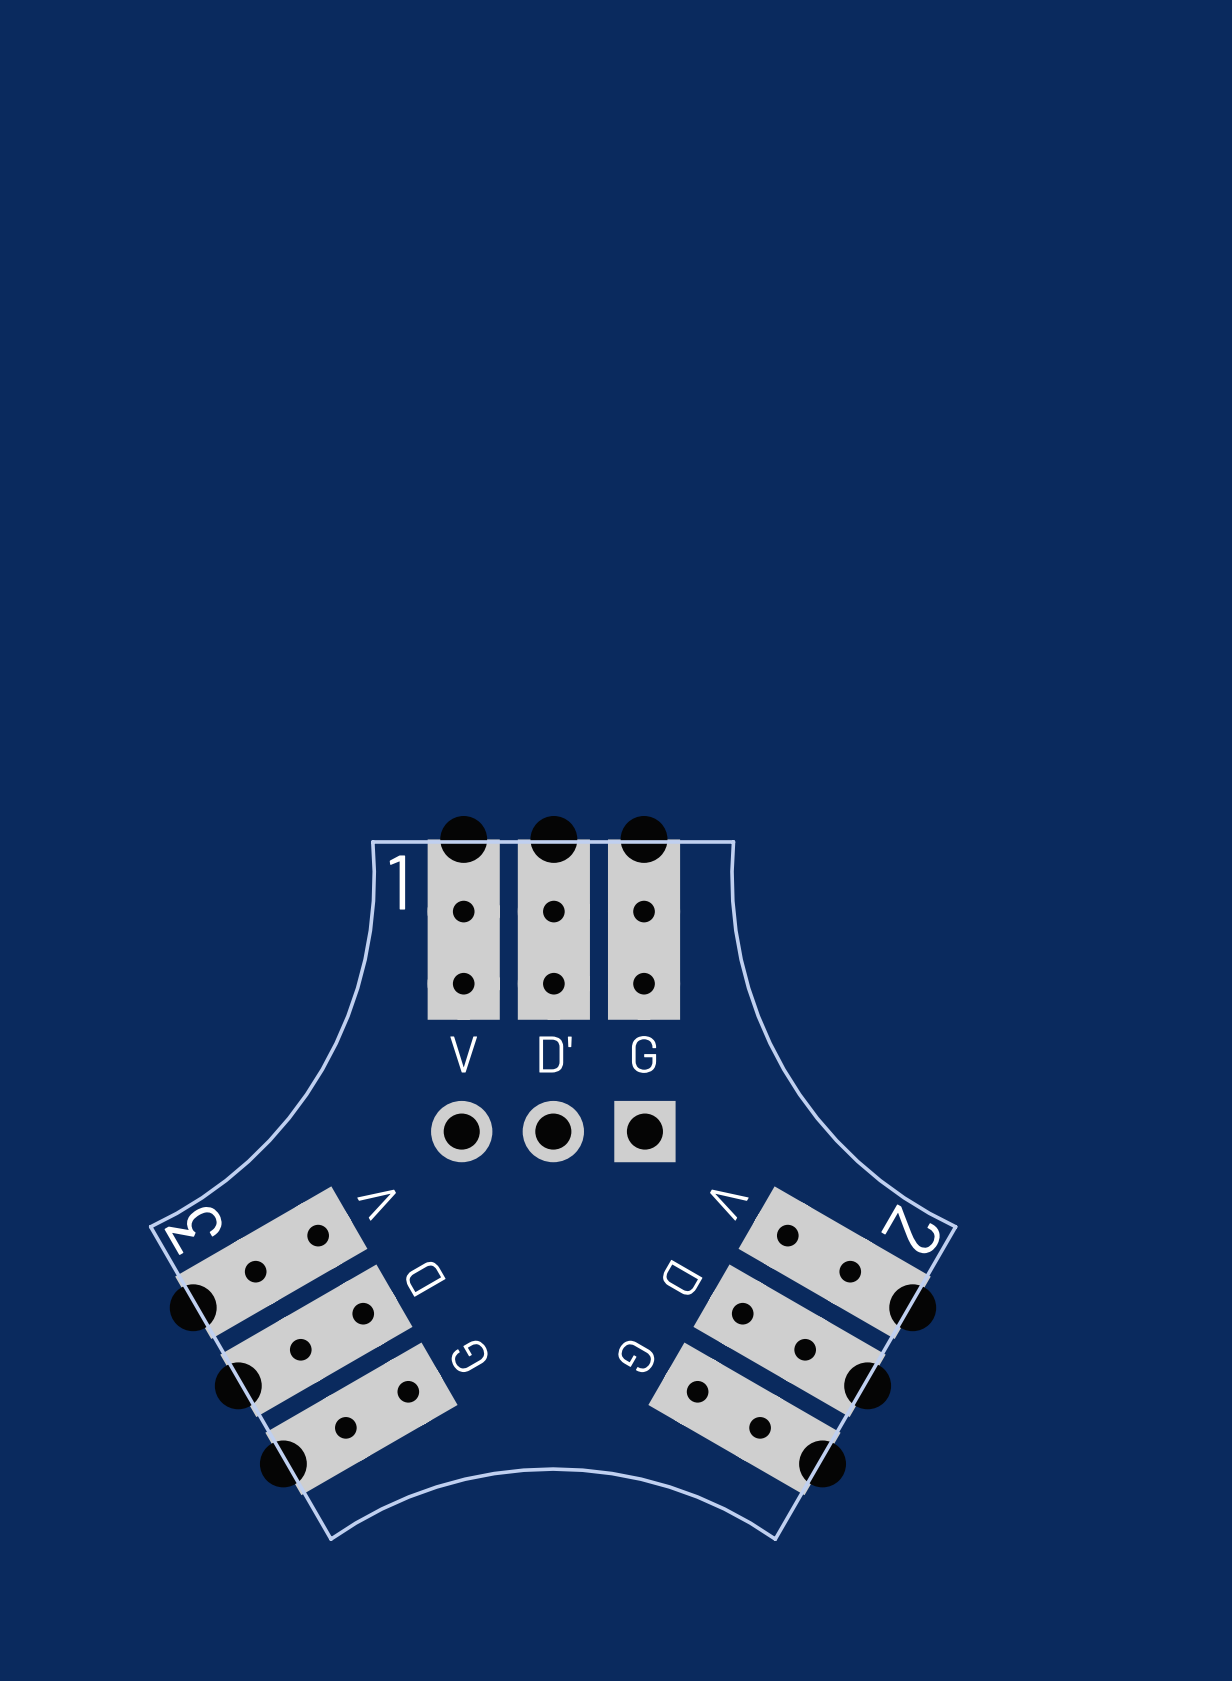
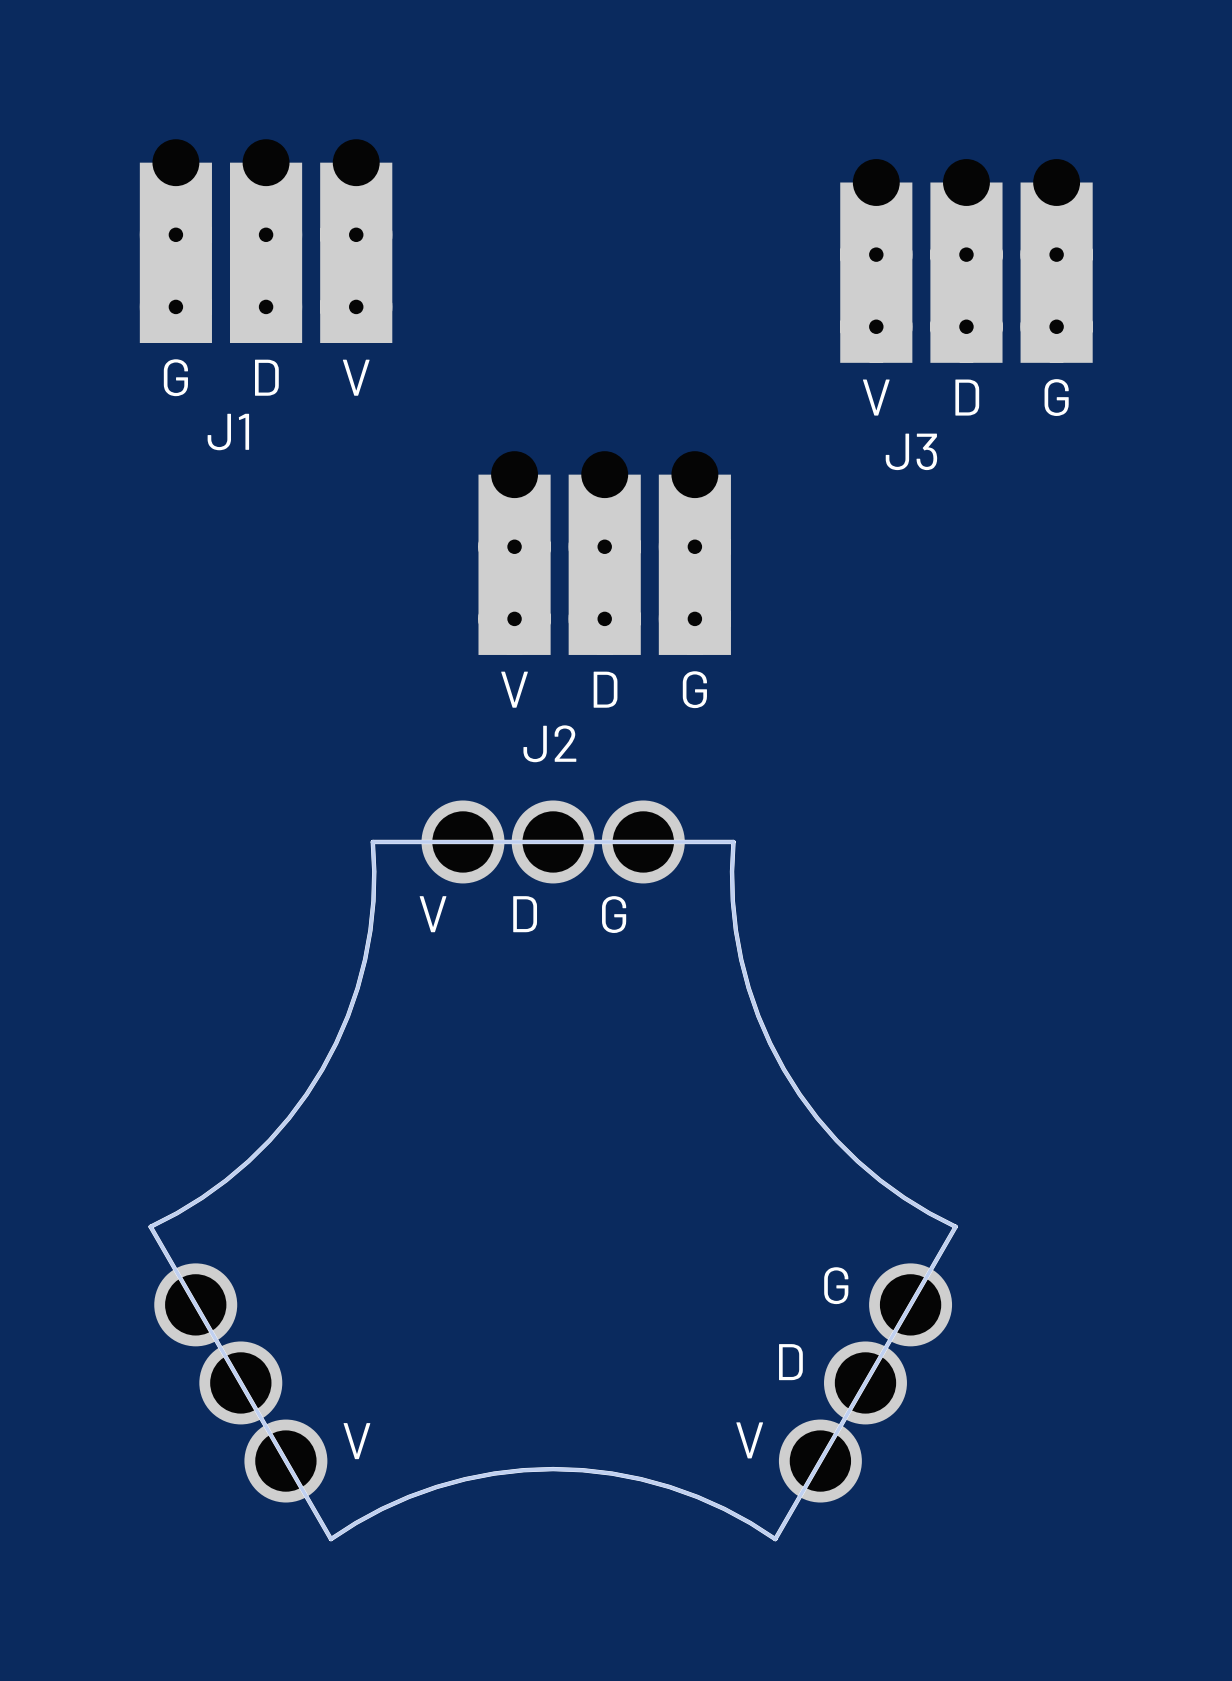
J1: none -> (266, 241)
J3: none -> (966, 260)
J2: none -> (604, 553)
text: 1 (397, 882) -> none
text: none -> V (433, 914)
text: none -> D (525, 914)
text: none -> G (614, 914)
part: (553, 917) -> none
part: (553, 1131) -> none
part: none -> (553, 1170)
text: 2 (910, 1228) -> none
text: 3 (193, 1230) -> none
text: none -> G (836, 1285)
part: (313, 1340) -> none
part: (792, 1340) -> none
text: none -> D (790, 1362)
text: none -> V (749, 1440)
text: none -> V (357, 1441)

